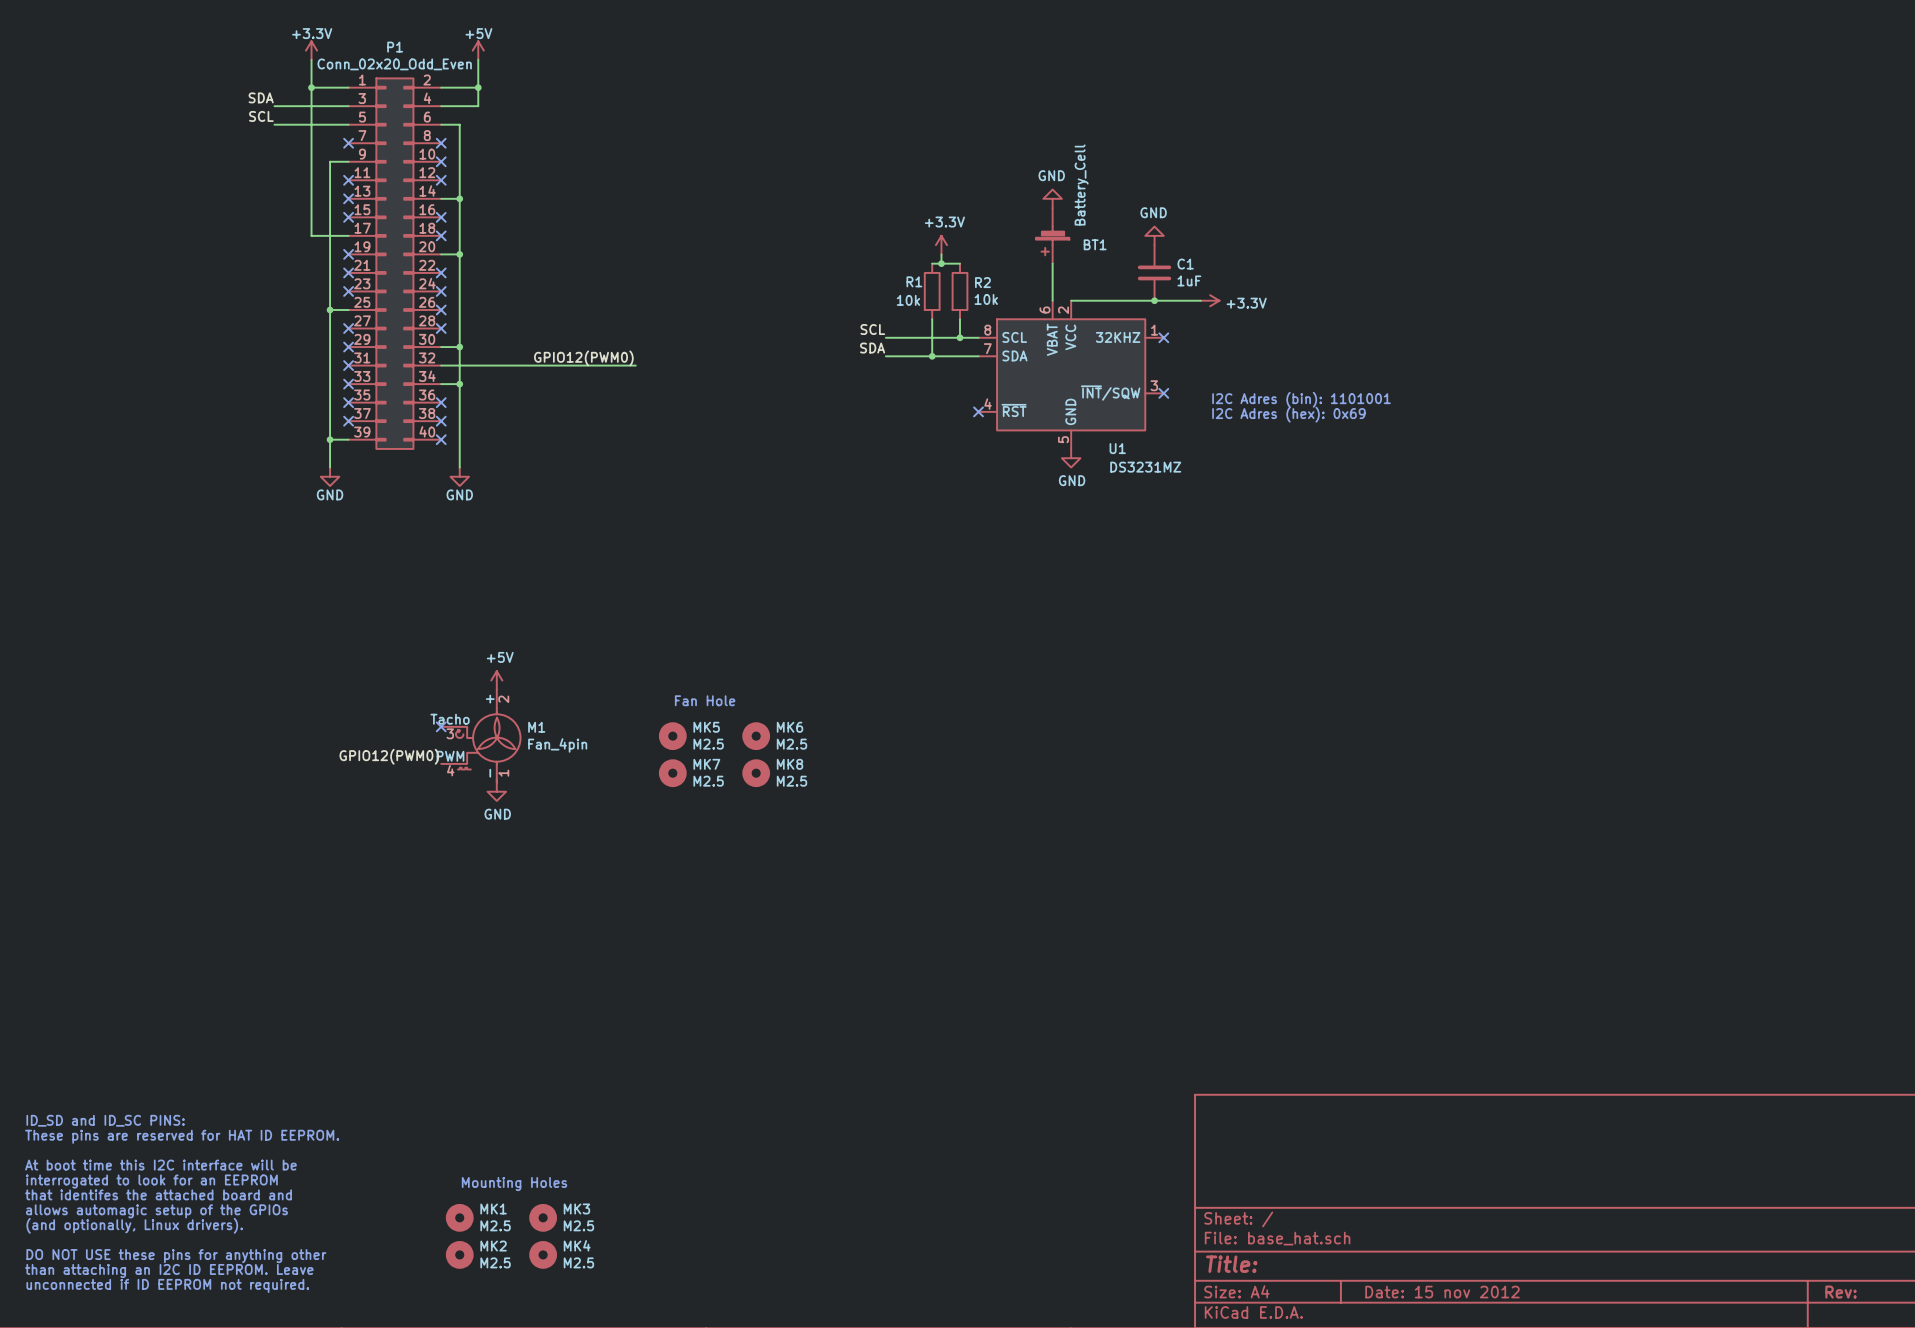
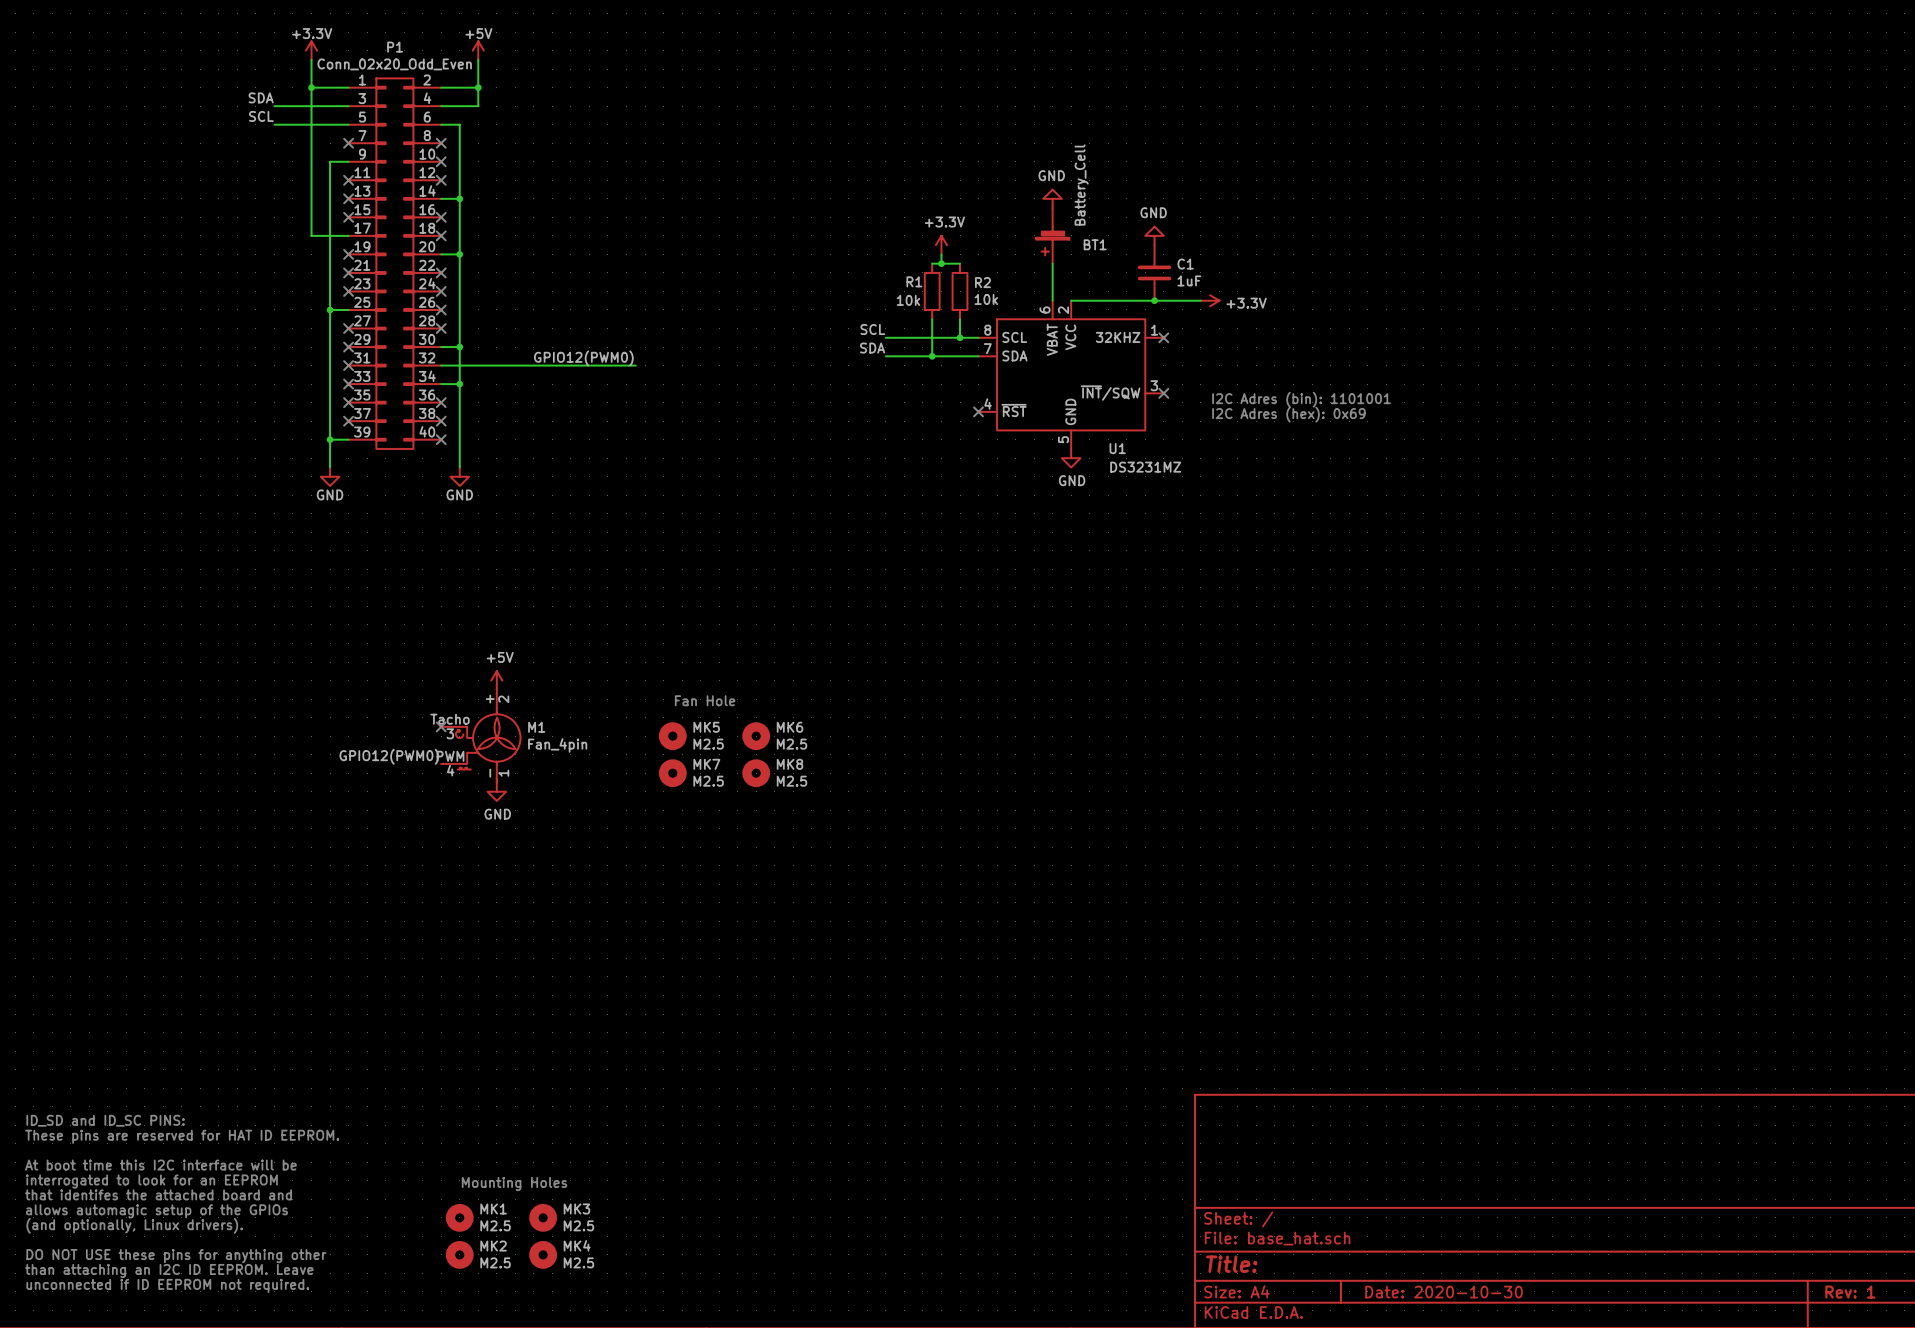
title block: Date: 15 nov 2012 (1442, 1292) -> Date: 2020-10-30 (1444, 1292)
title block: Rev: (1841, 1292) -> Rev: 1 (1850, 1292)

